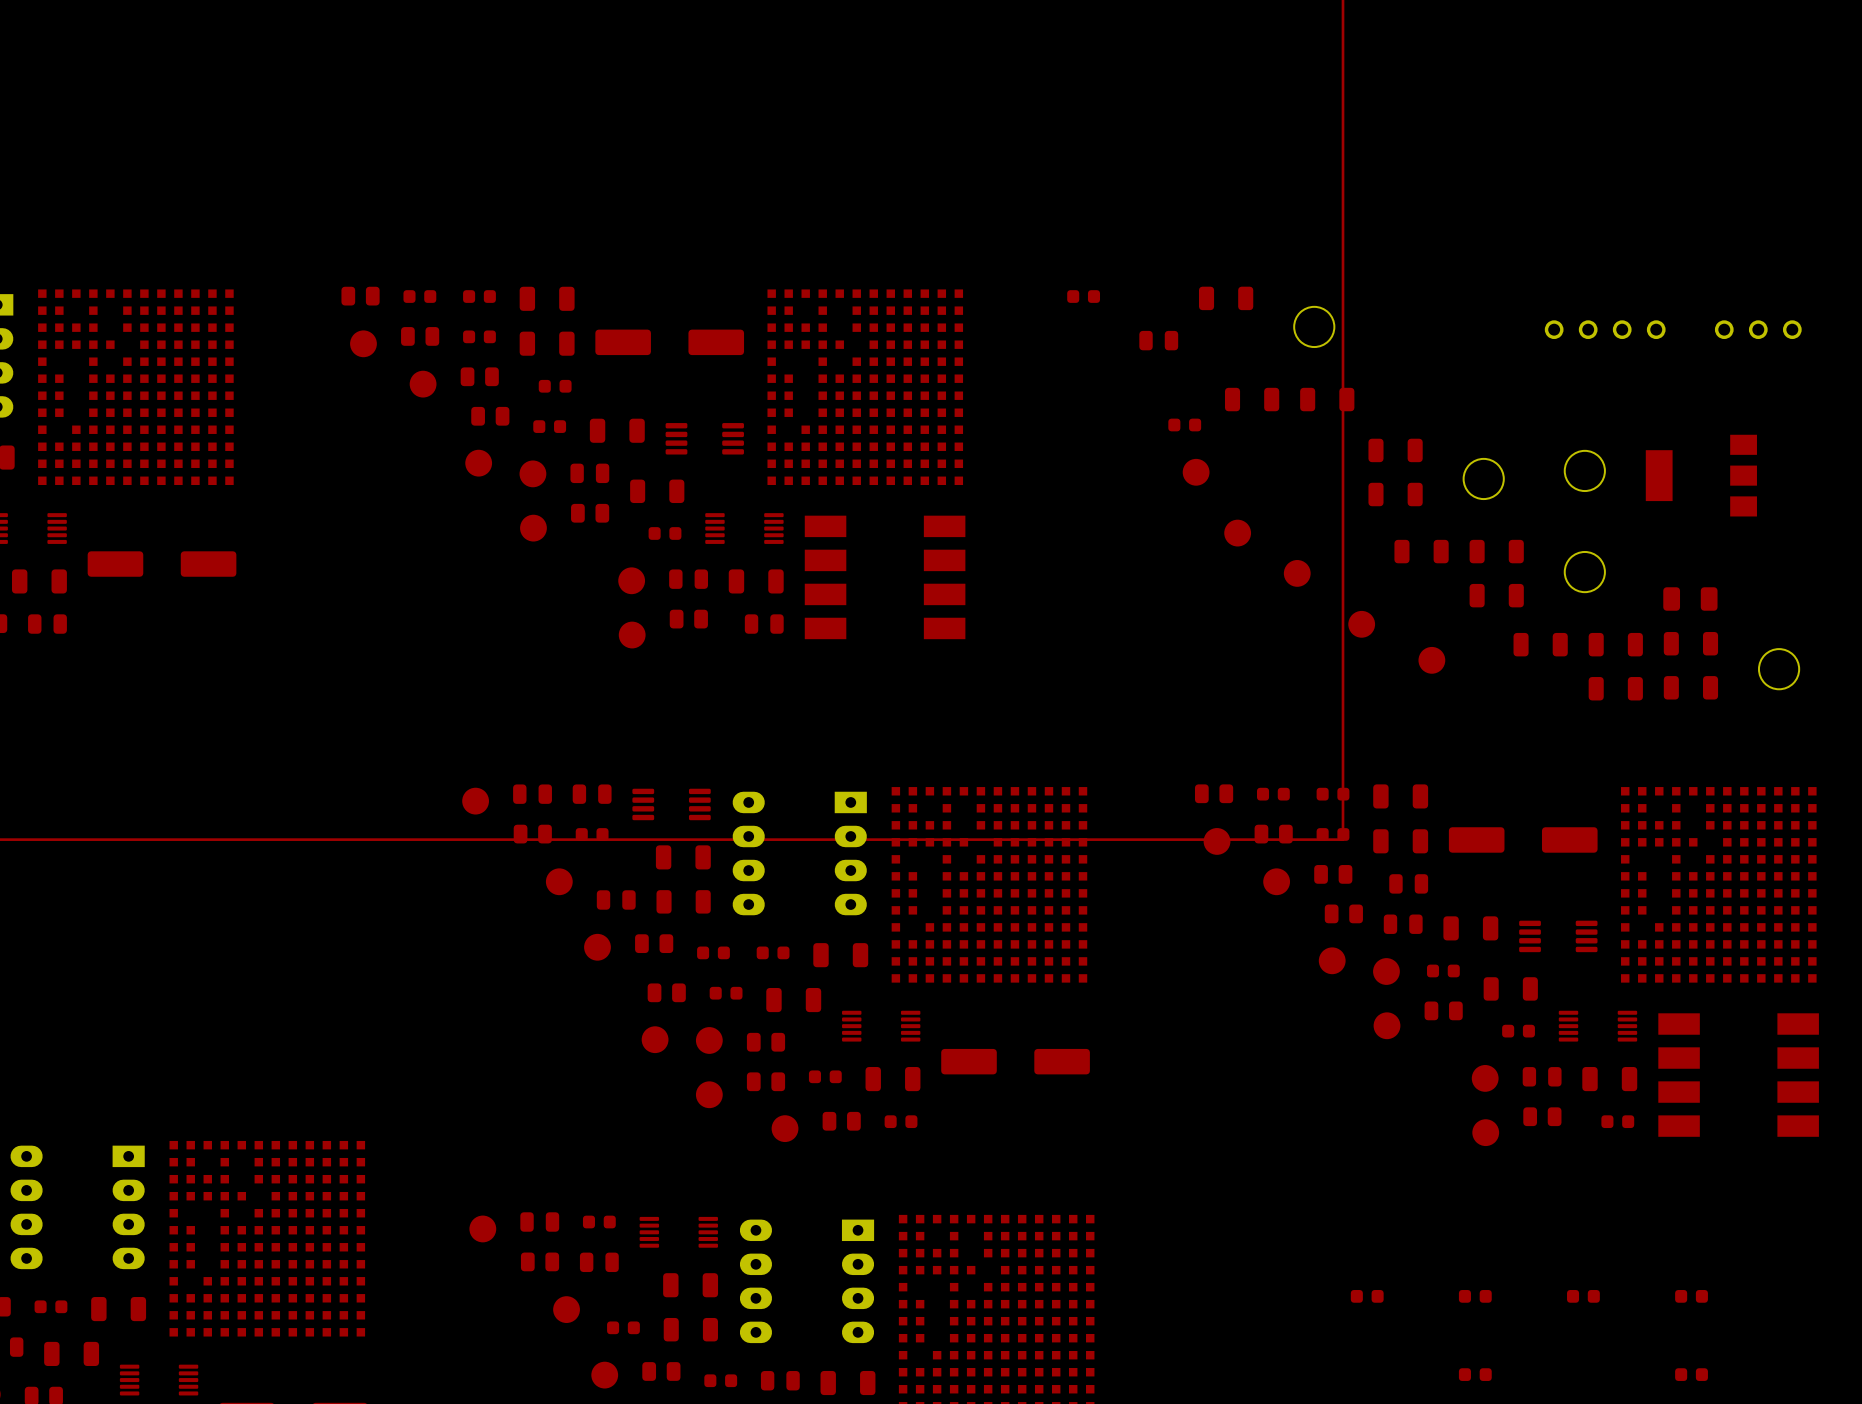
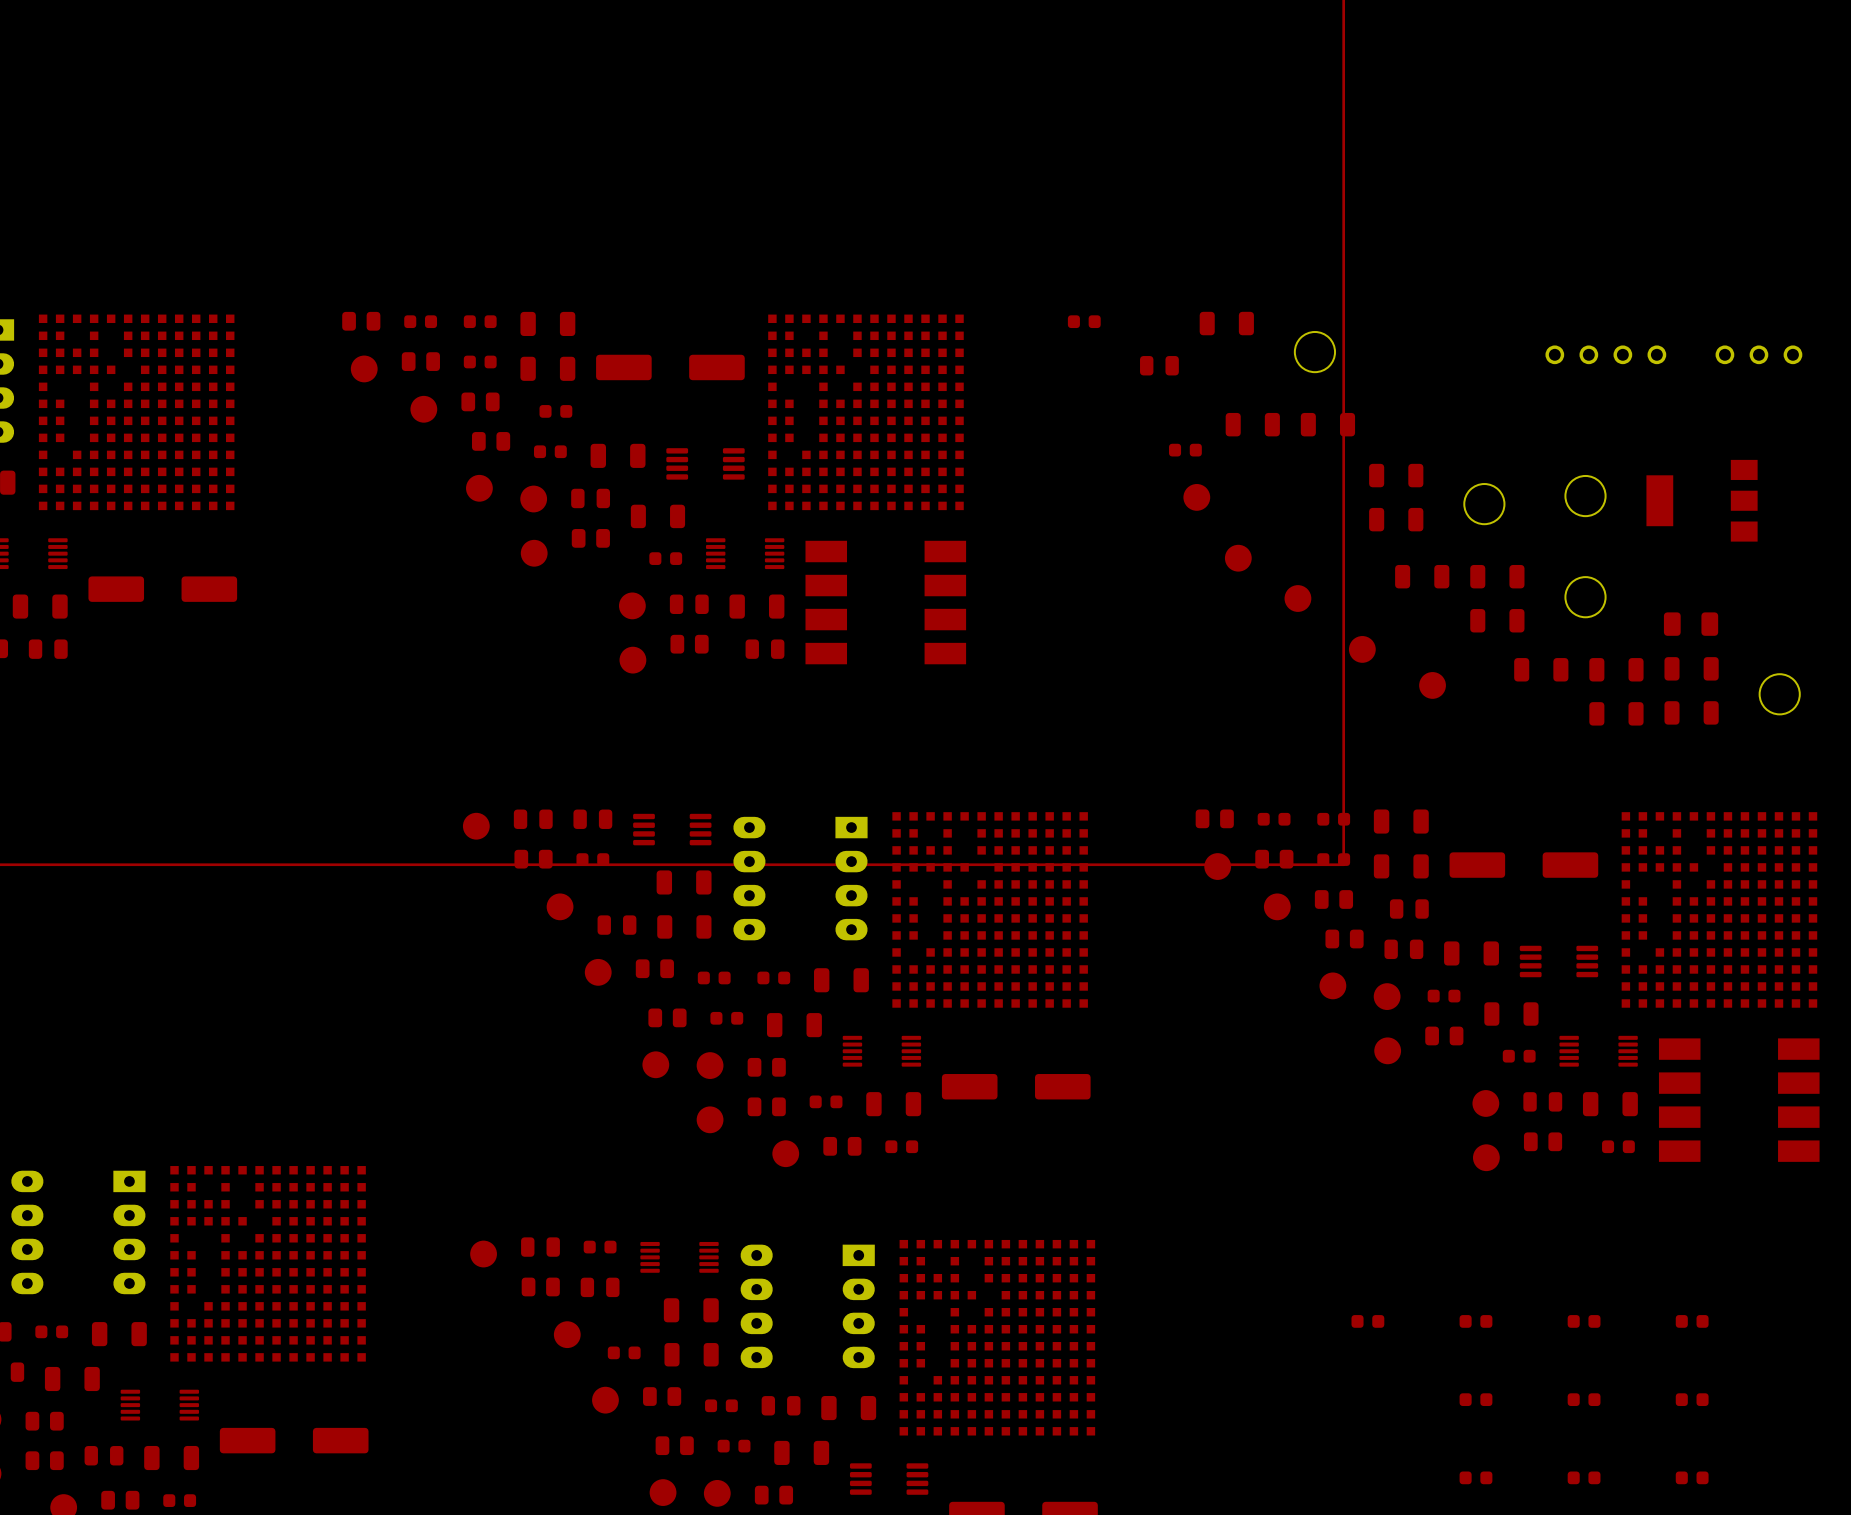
part: none -> (1584, 1399)

